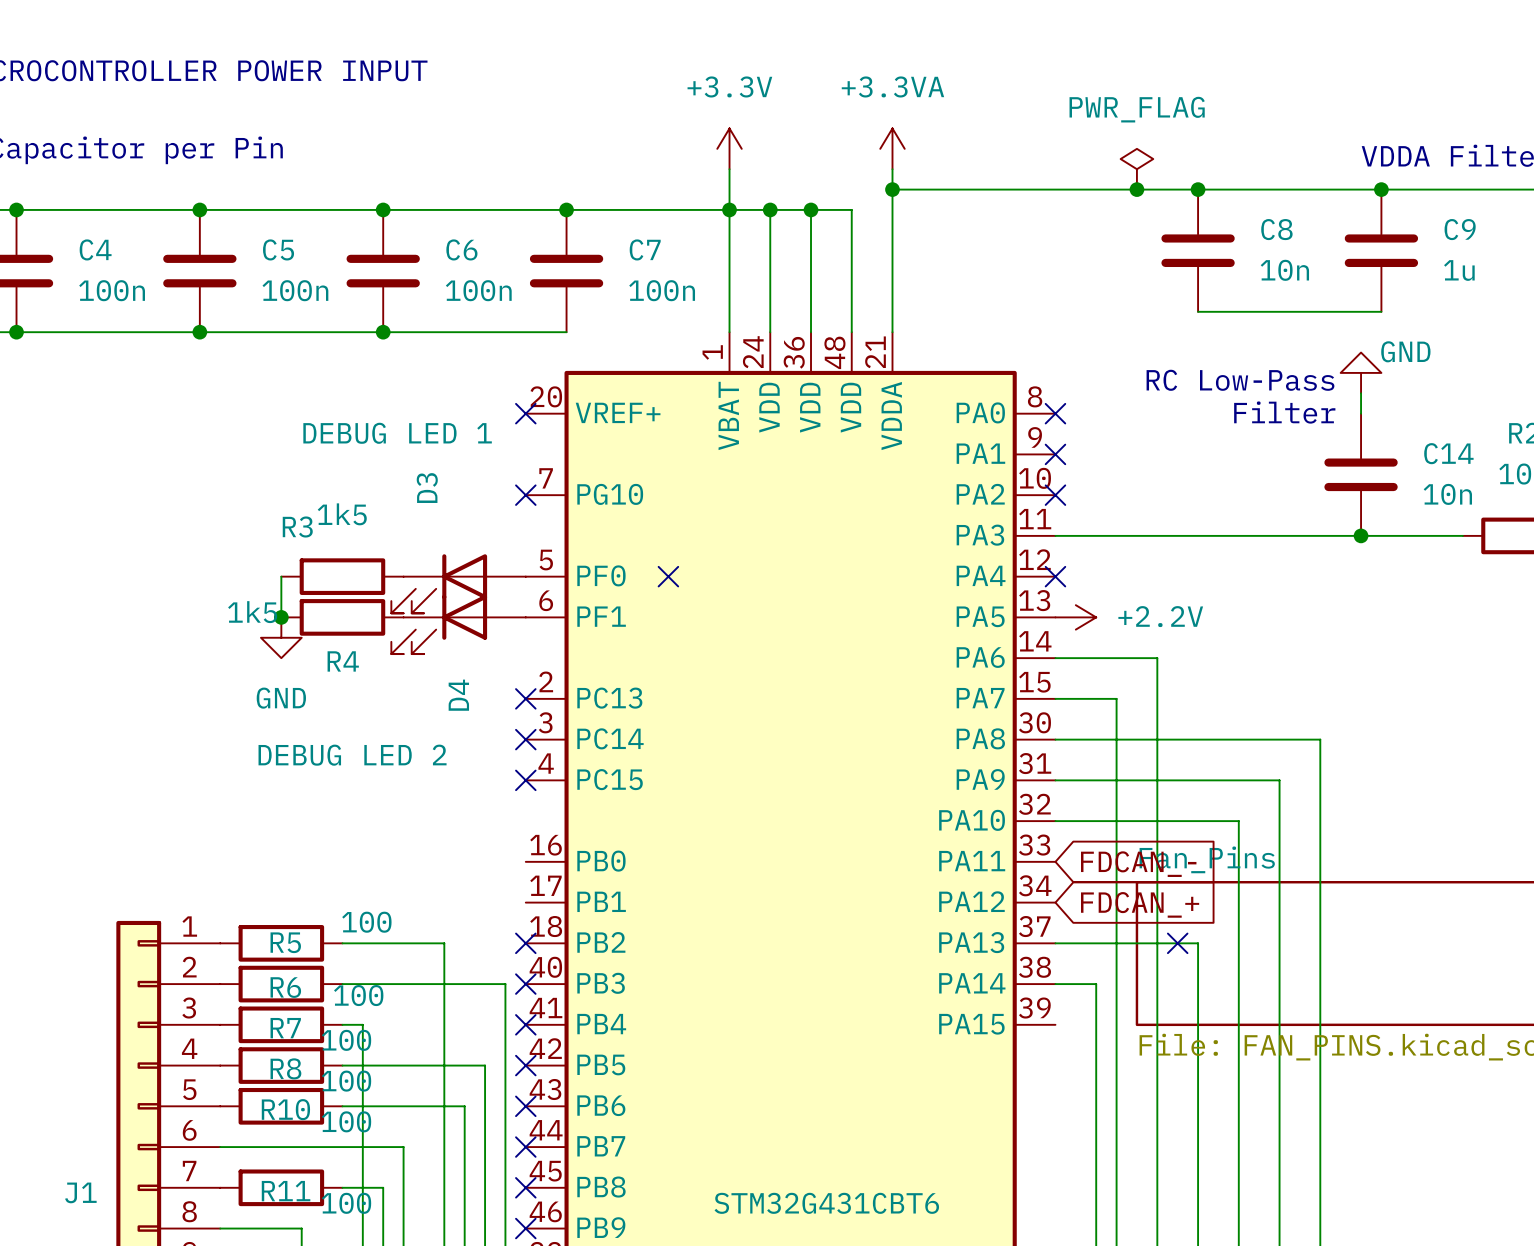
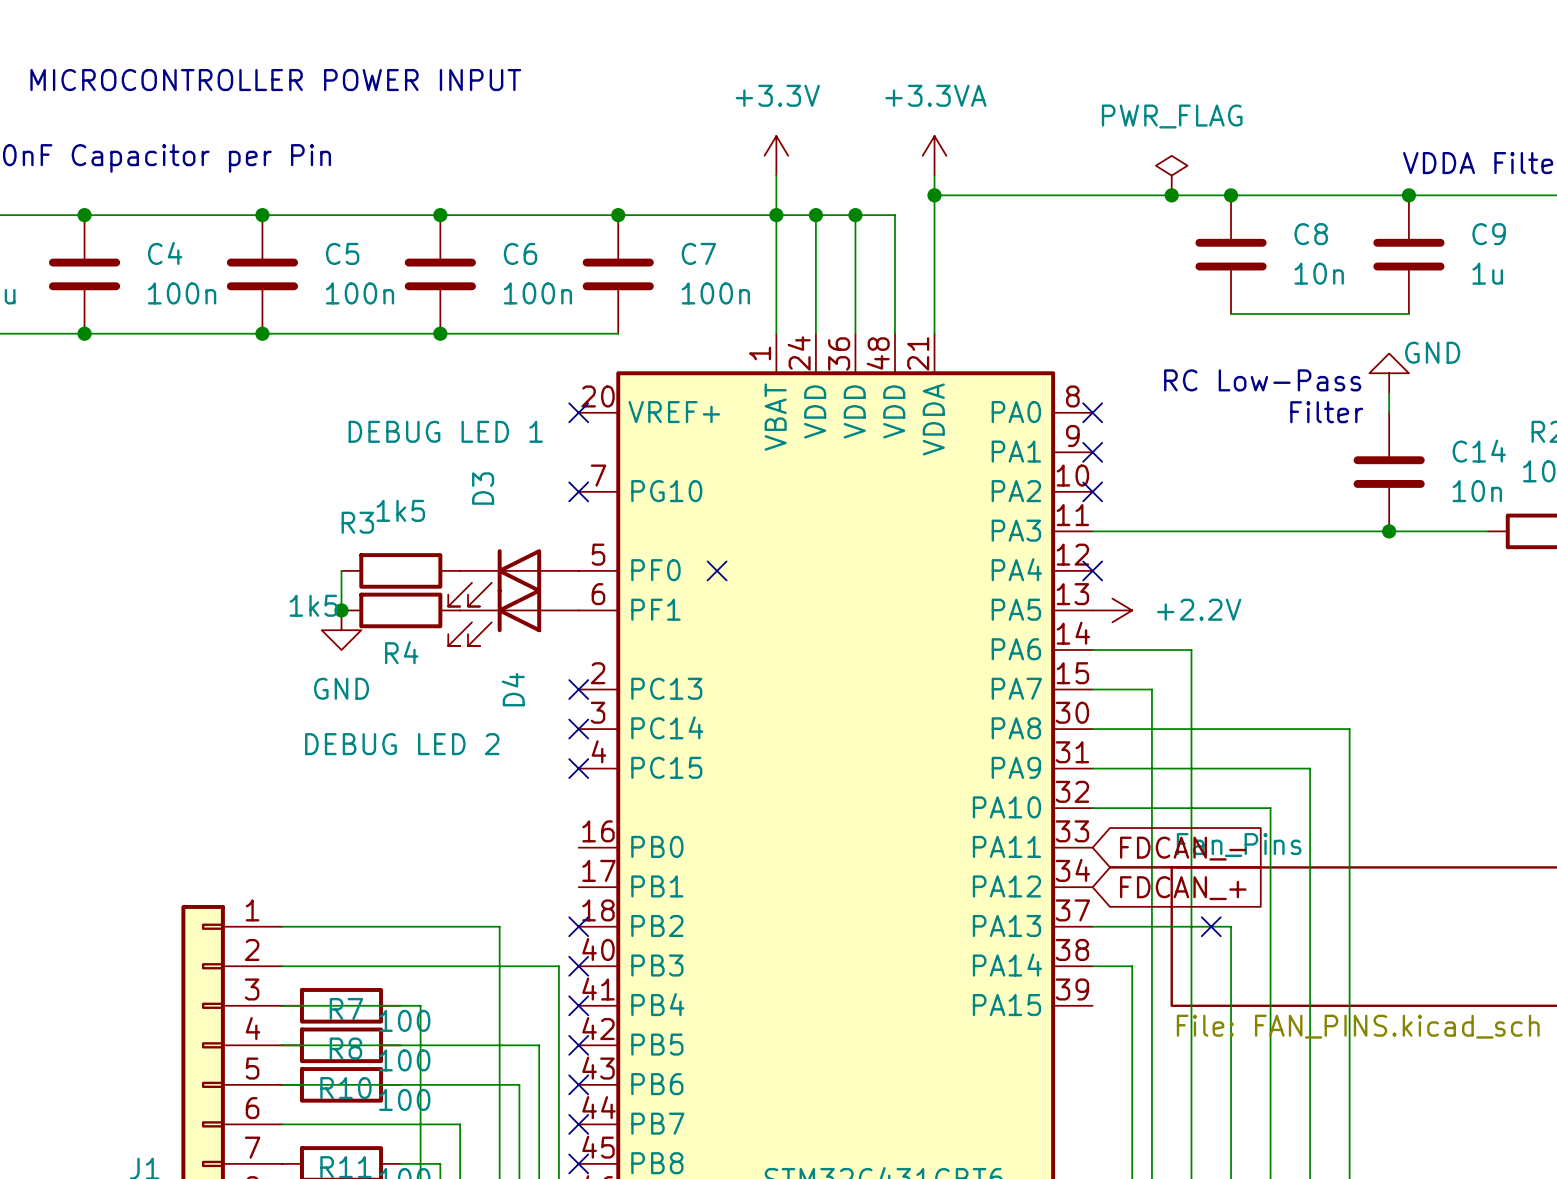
wire: none -> (282, 926) (400, 926)
R5: 100 (281, 943) -> none
wire: none -> (282, 966) (400, 966)
R6: 100 (281, 984) -> none
wire: none -> (282, 1005) (400, 1005)
wire: none -> (282, 1045) (400, 1045)
wire: none -> (282, 1084) (400, 1084)

